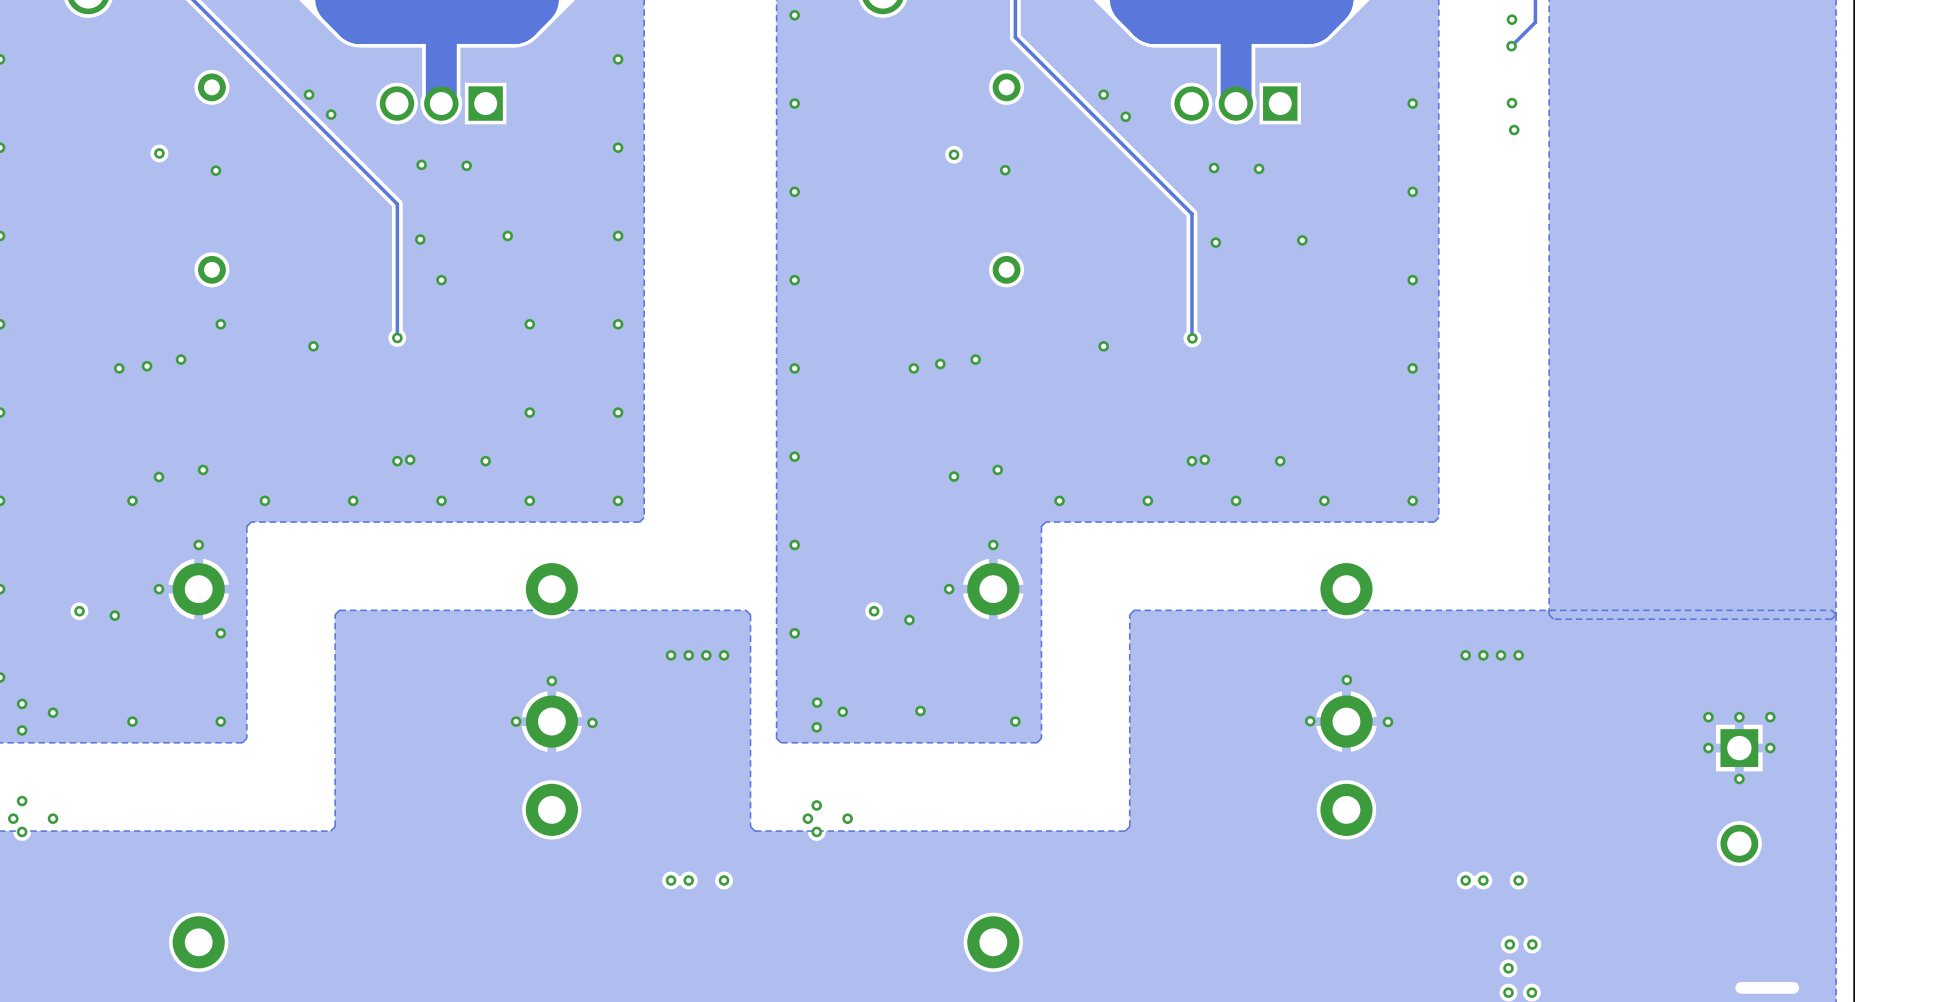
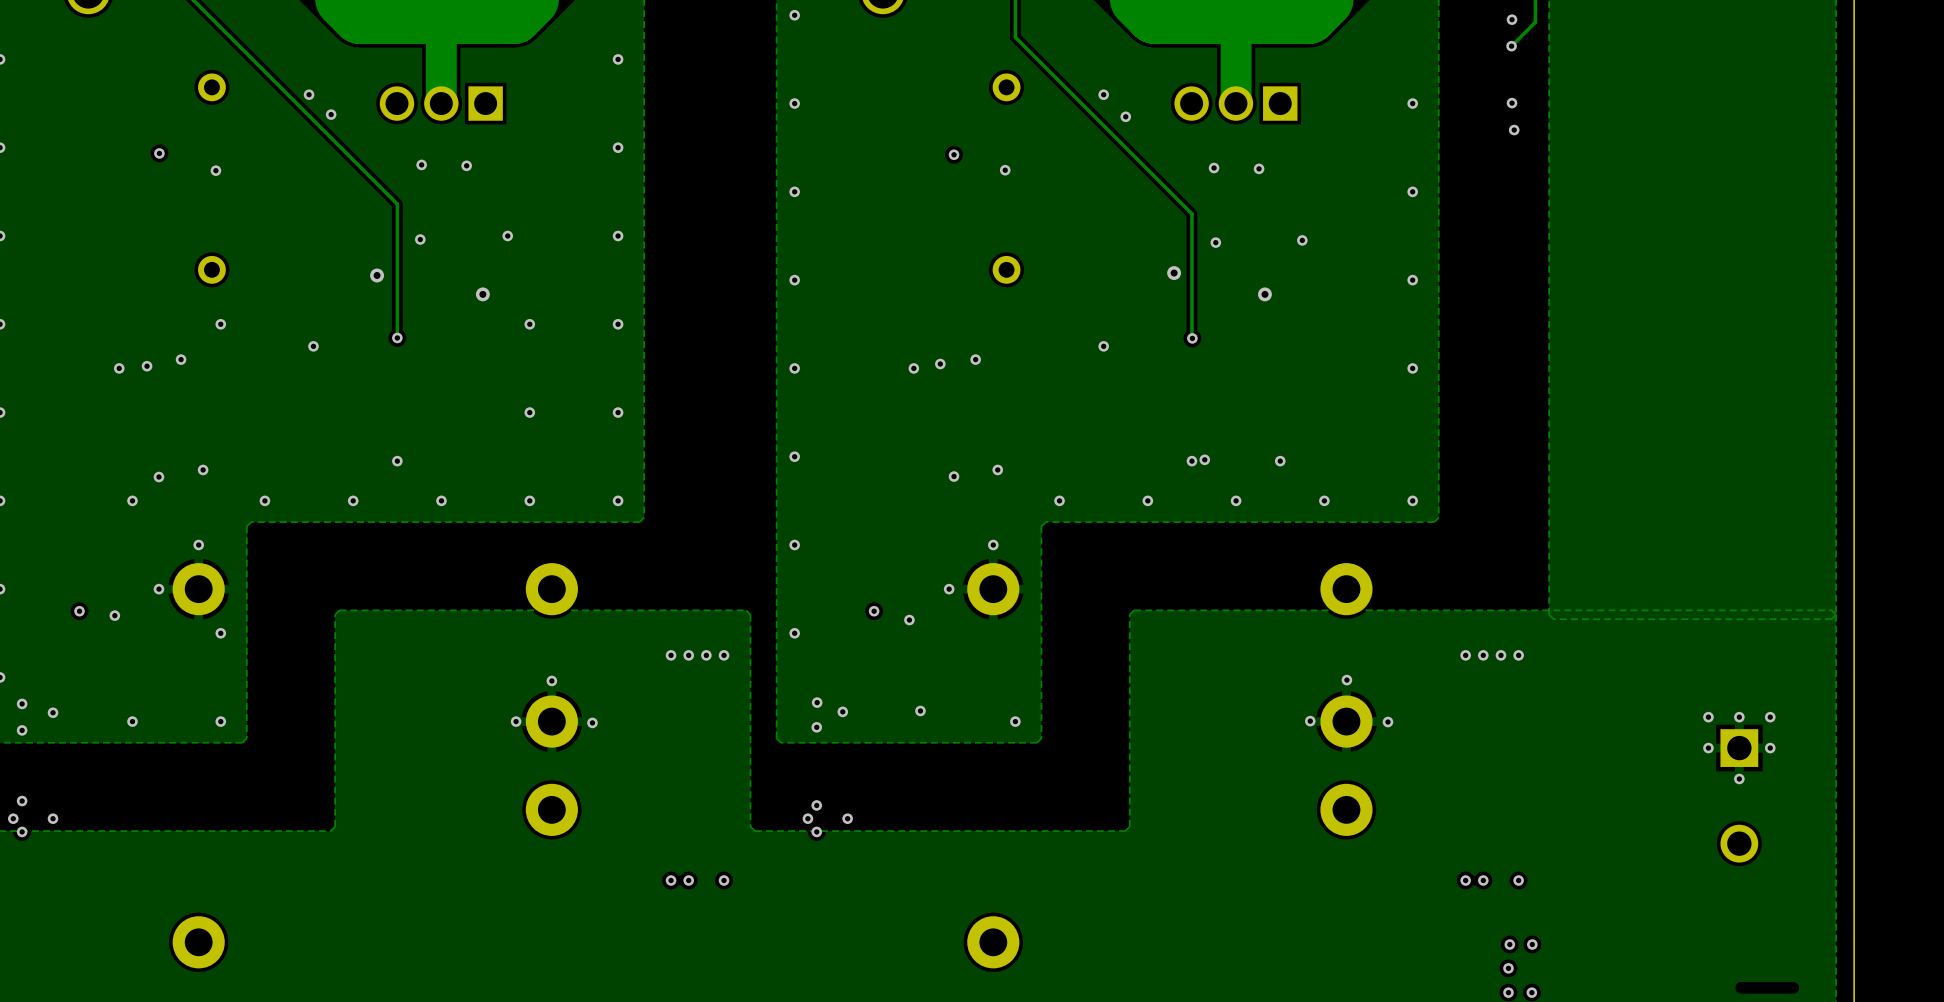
via: none -> (1174, 273)
via: none -> (377, 275)
via: (441, 280) -> none
via: none -> (482, 294)
via: none -> (1264, 294)
via: (410, 459) -> none
via: (485, 461) -> none

